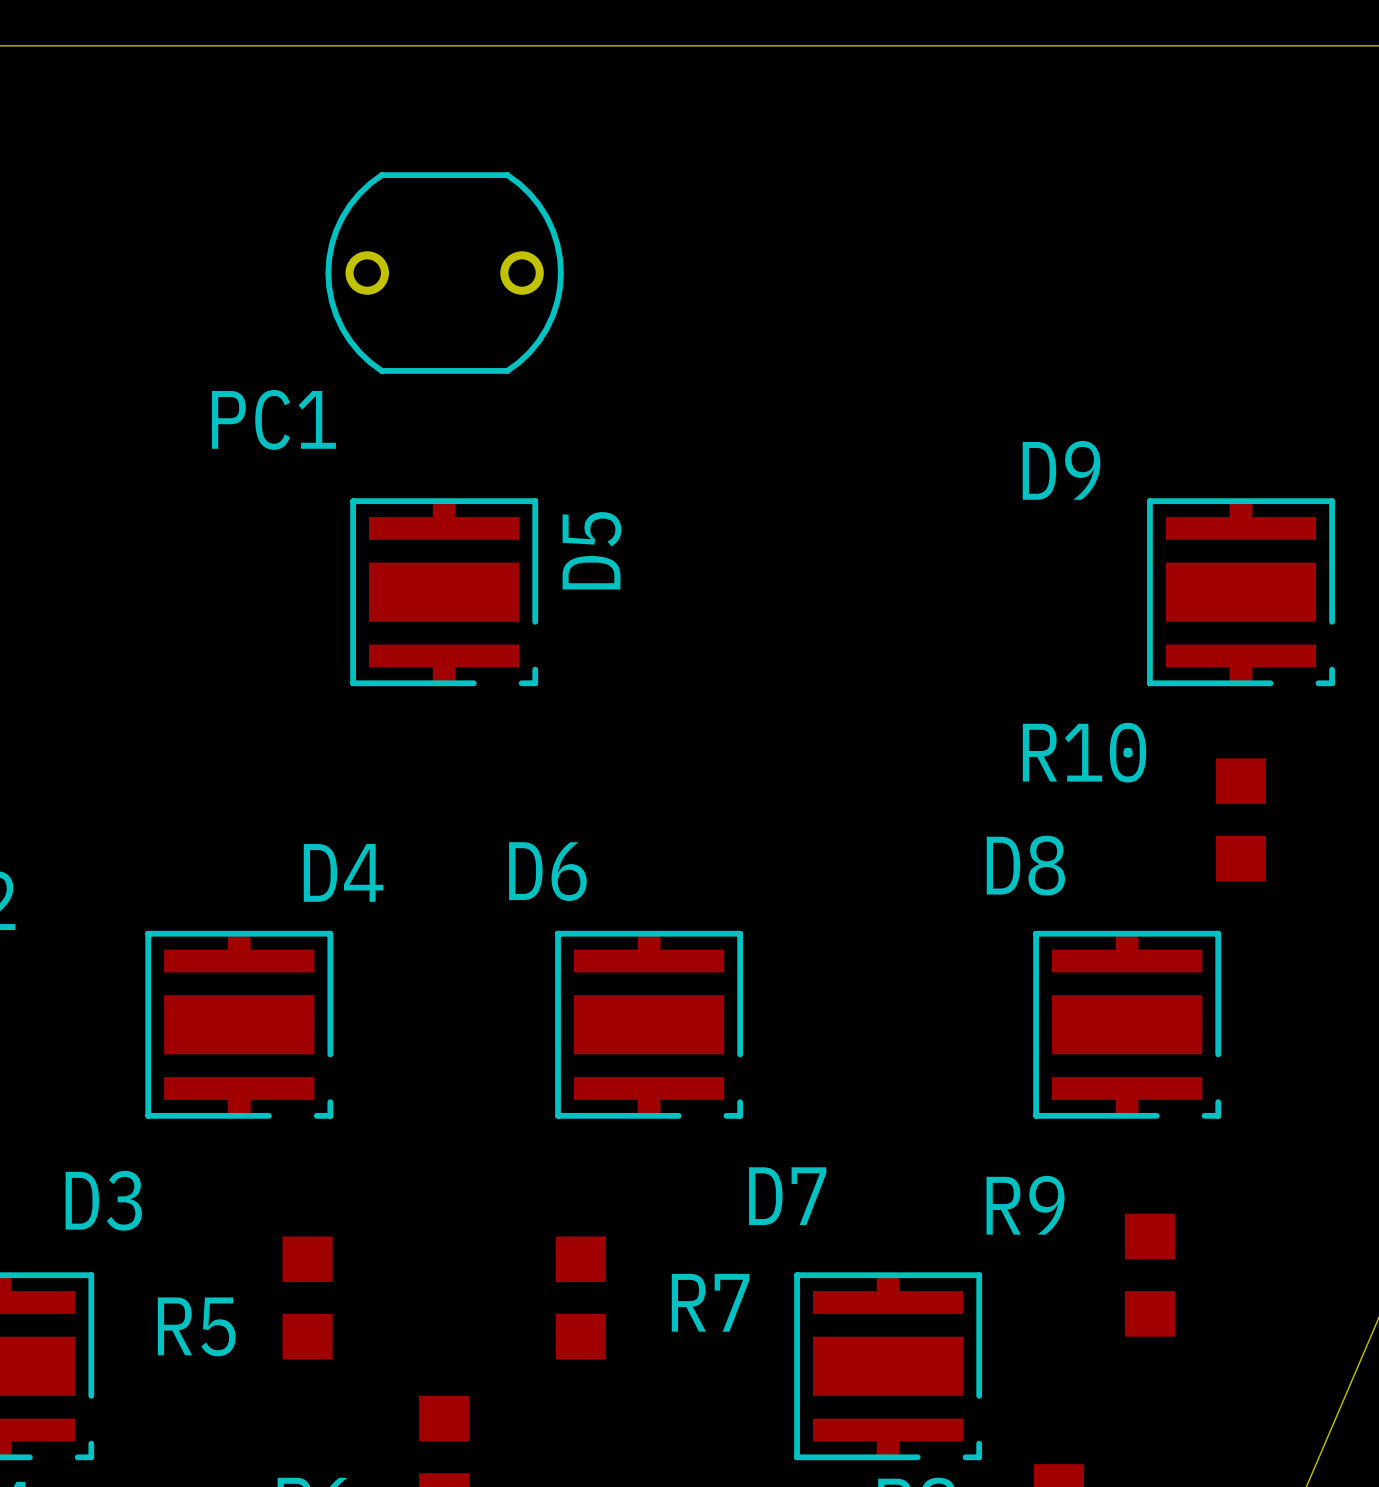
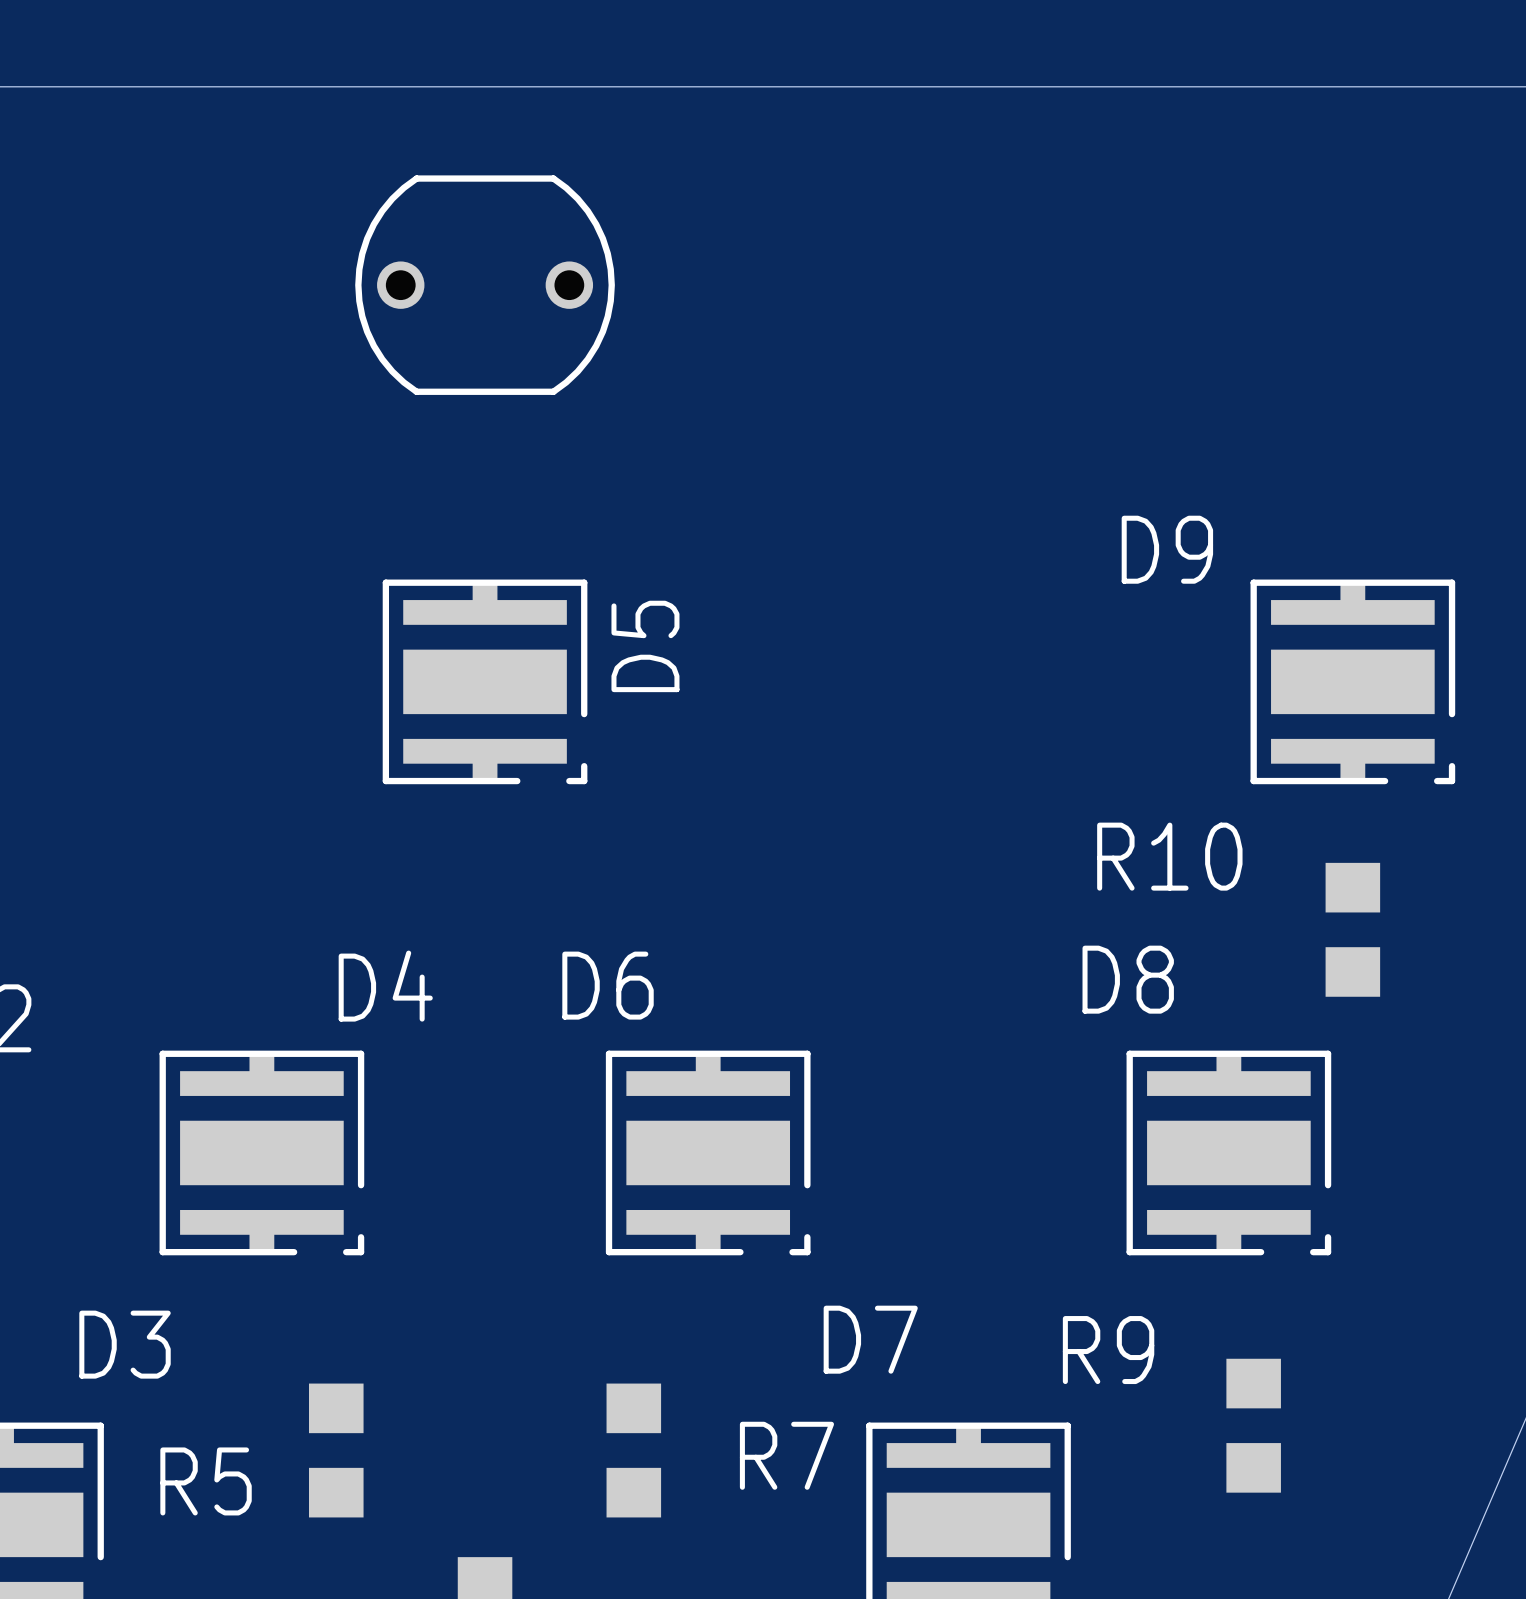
PC1 position: (444, 273) -> (485, 285)
PC1 name: PC1 (273, 419) -> none

